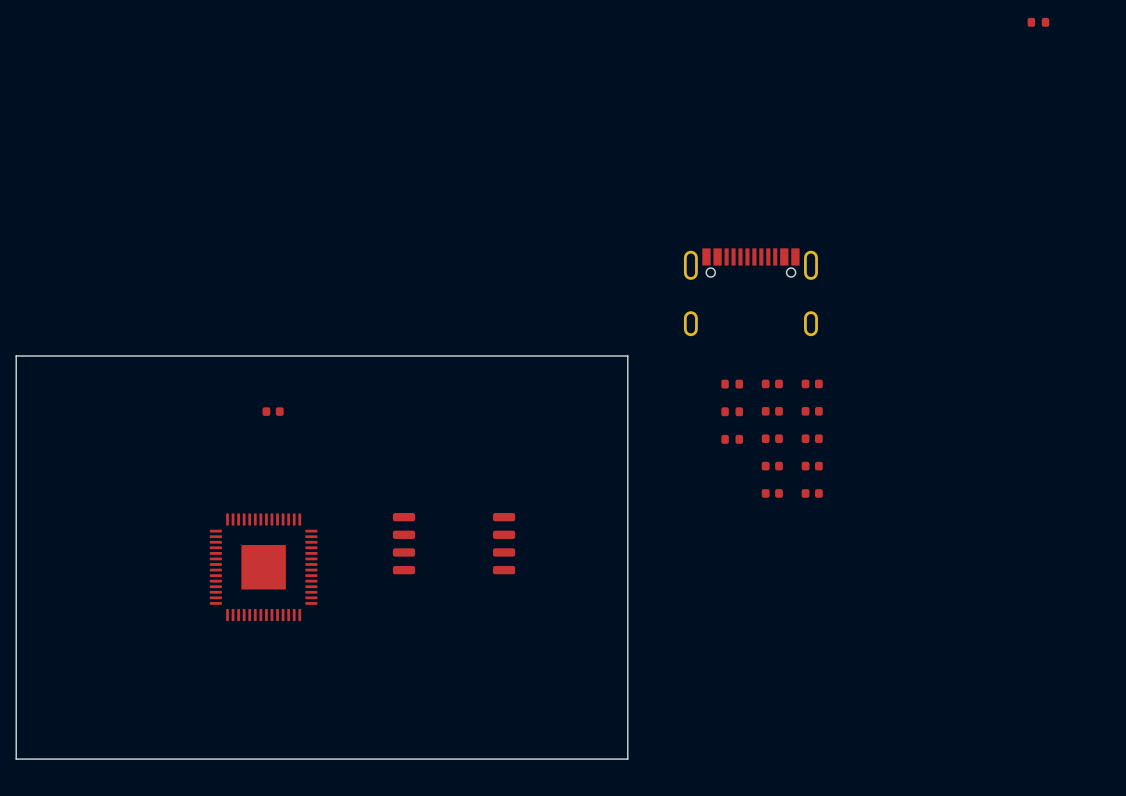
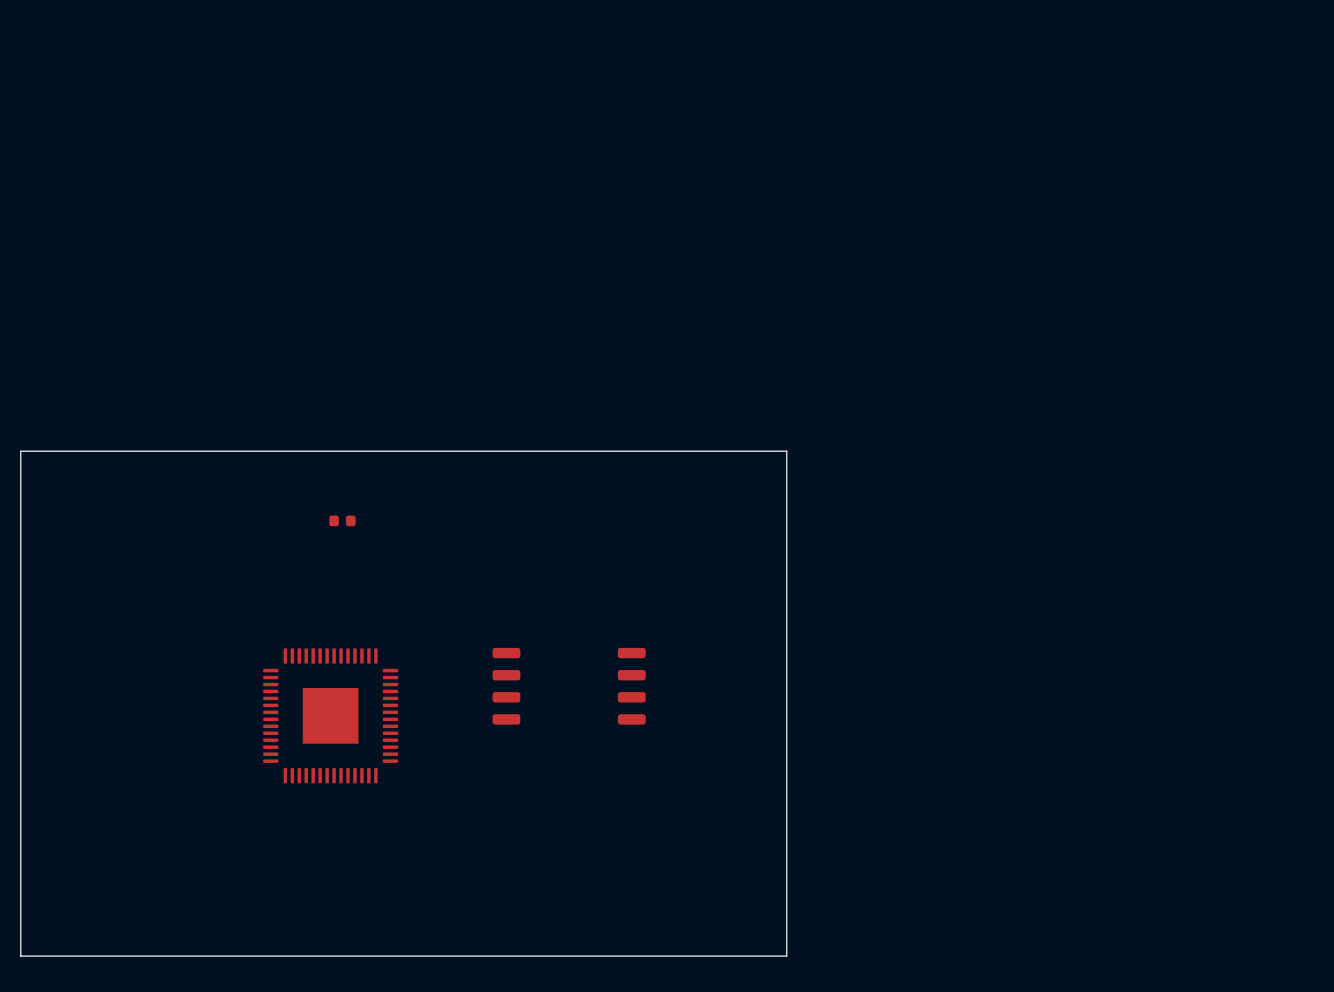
part: (1038, 22) -> none
part: (750, 292) -> none
part: (772, 383) -> none
part: (812, 383) -> none
part: (732, 384) -> none
part: (732, 411) -> none
part: (772, 411) -> none
part: (812, 411) -> none
part: (772, 438) -> none
part: (812, 438) -> none
part: (732, 439) -> none
part: (772, 466) -> none
part: (812, 466) -> none
part: (772, 493) -> none
part: (812, 493) -> none

